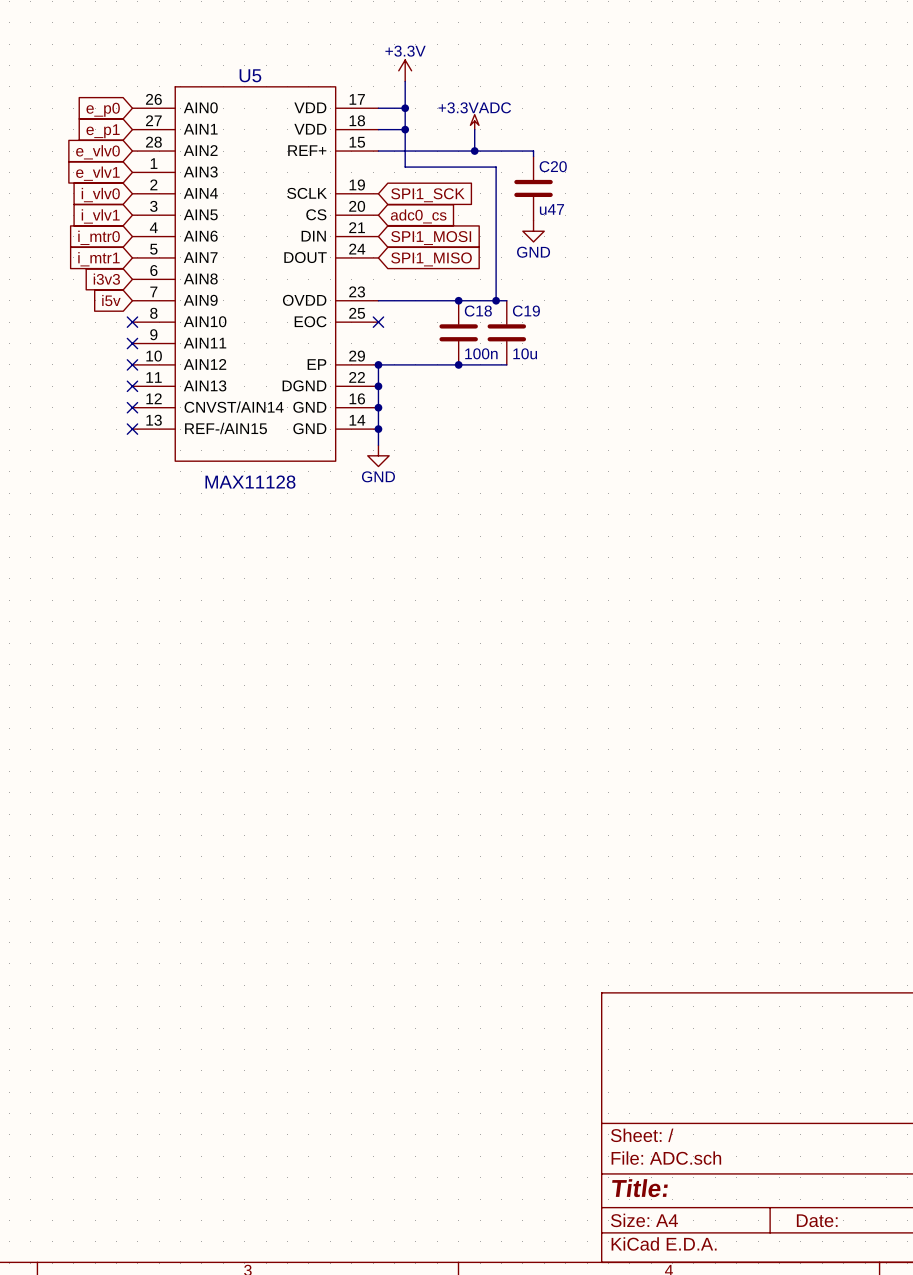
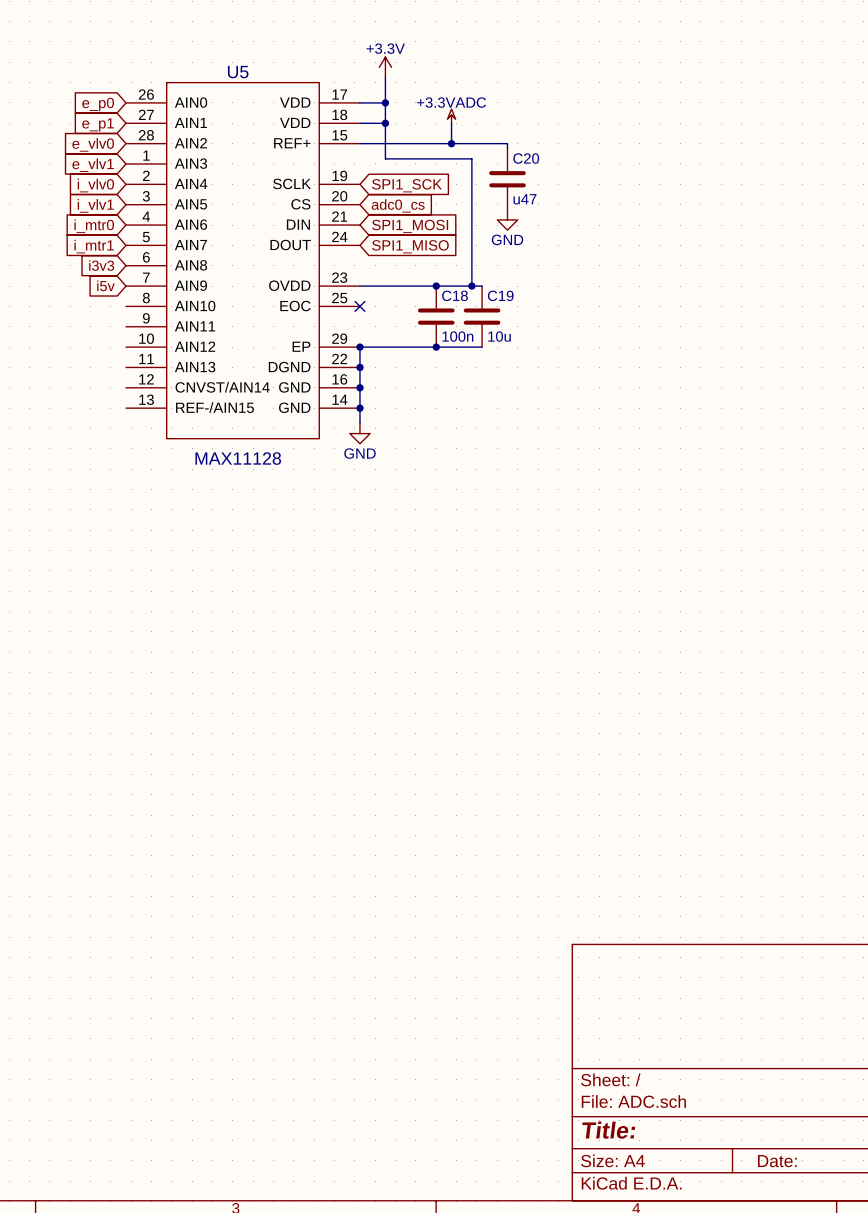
no-connect mark: (132, 322) -> none
no-connect mark: (132, 343) -> none
no-connect mark: (132, 364) -> none
no-connect mark: (132, 386) -> none
no-connect mark: (132, 407) -> none
no-connect mark: (132, 429) -> none

